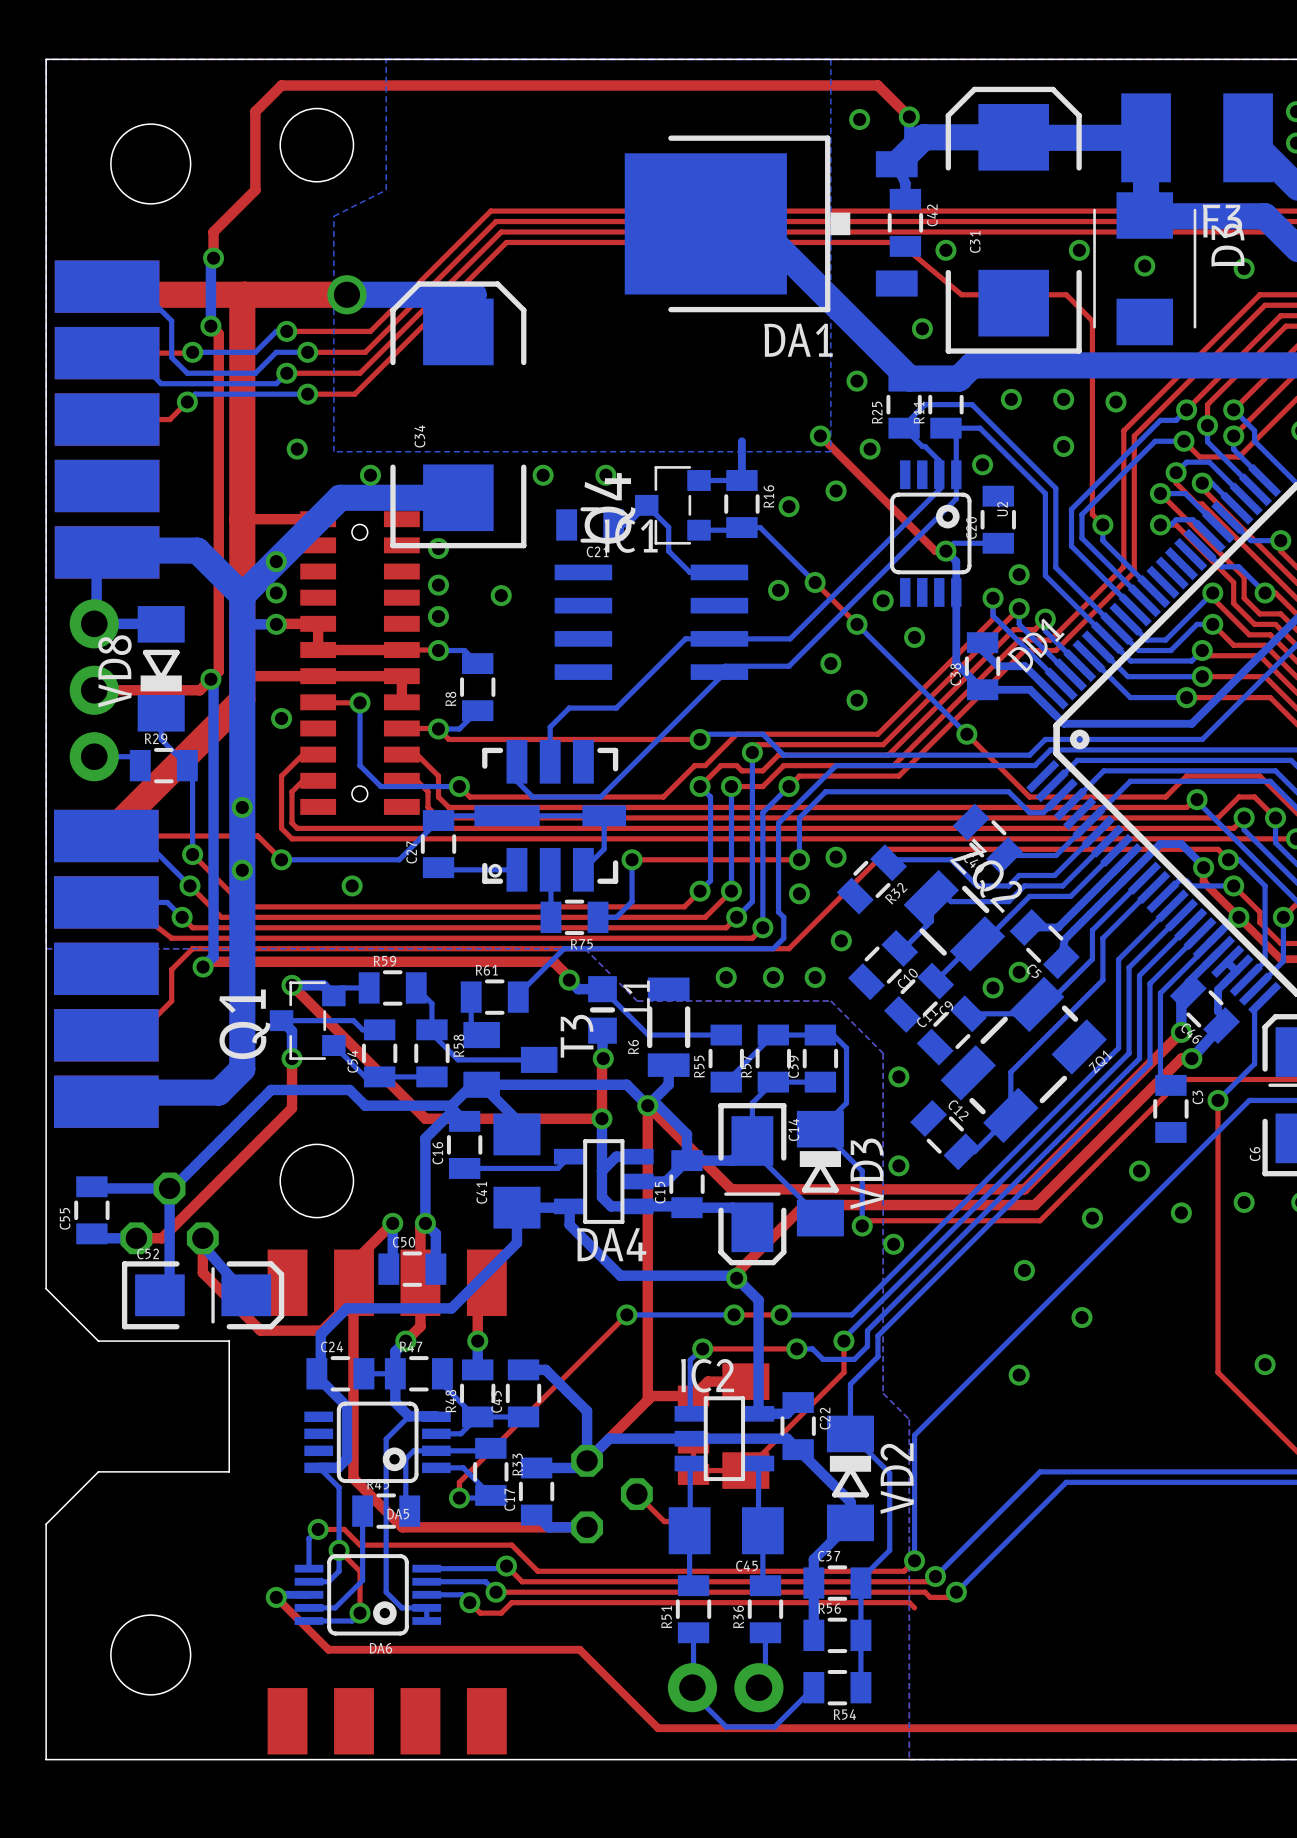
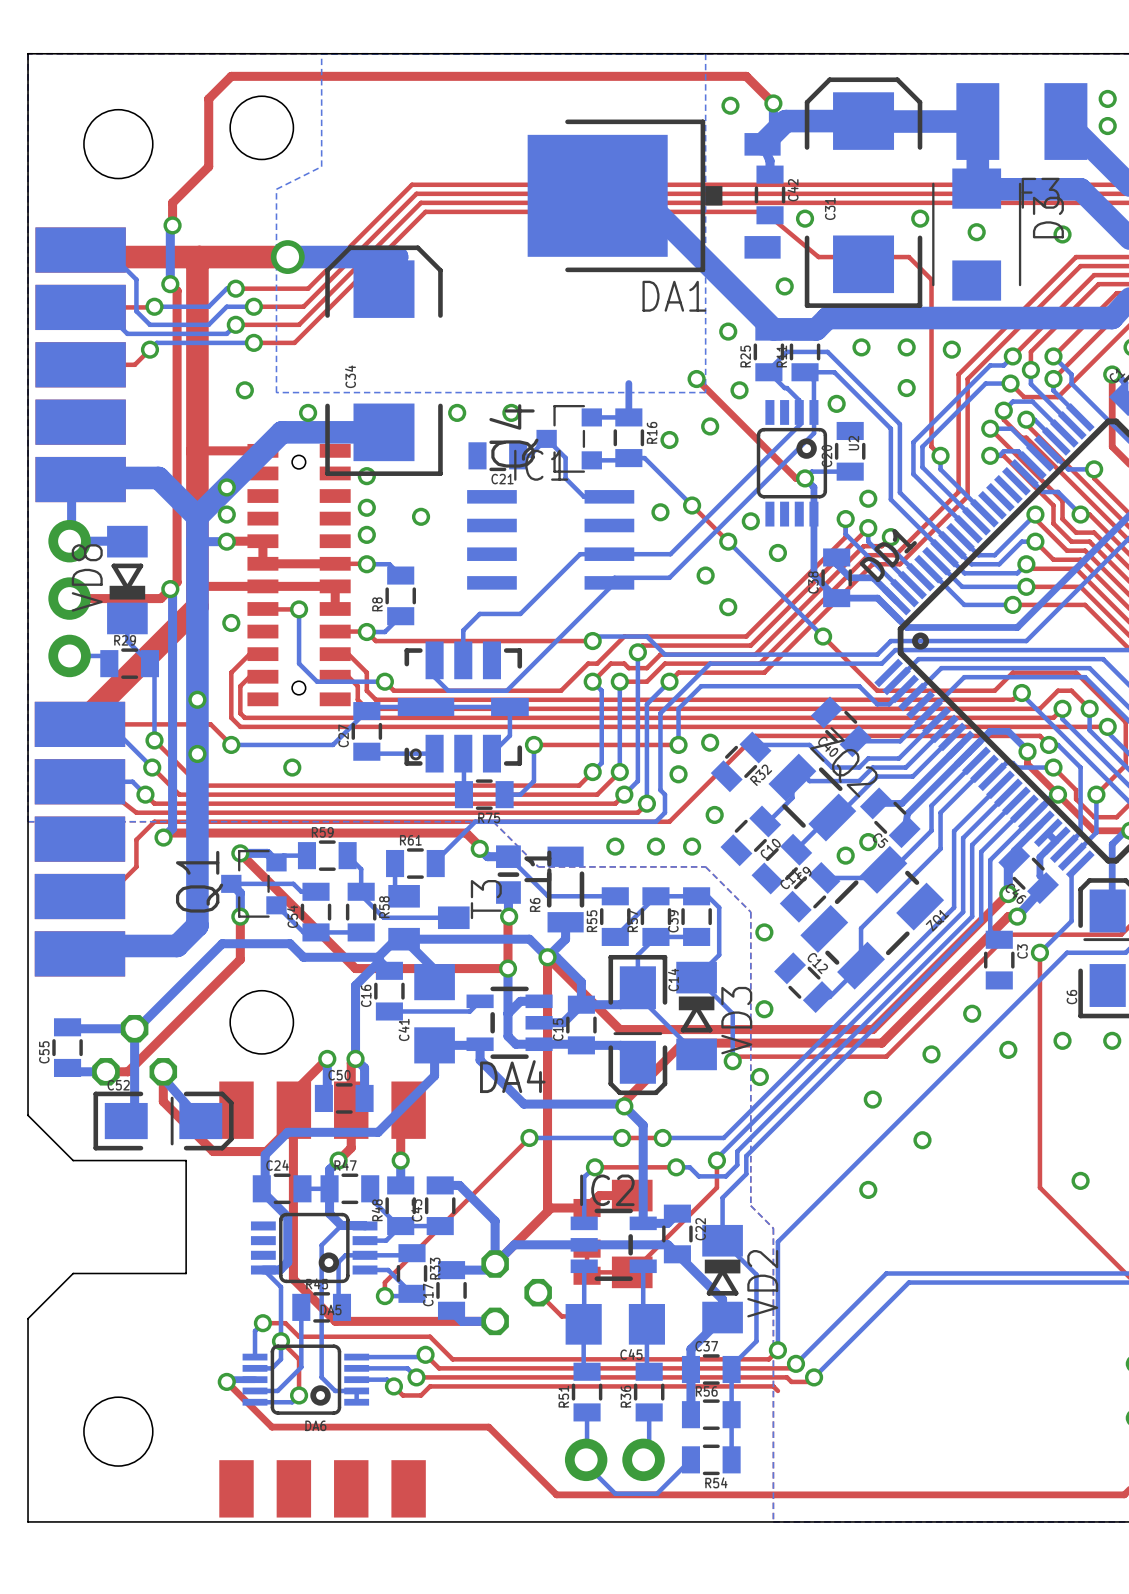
DA4 footprint: [553, 1139, 654, 1224] -> [466, 986, 553, 1059]
IC2 footprint: [674, 1396, 775, 1482] -> [570, 1208, 657, 1281]

